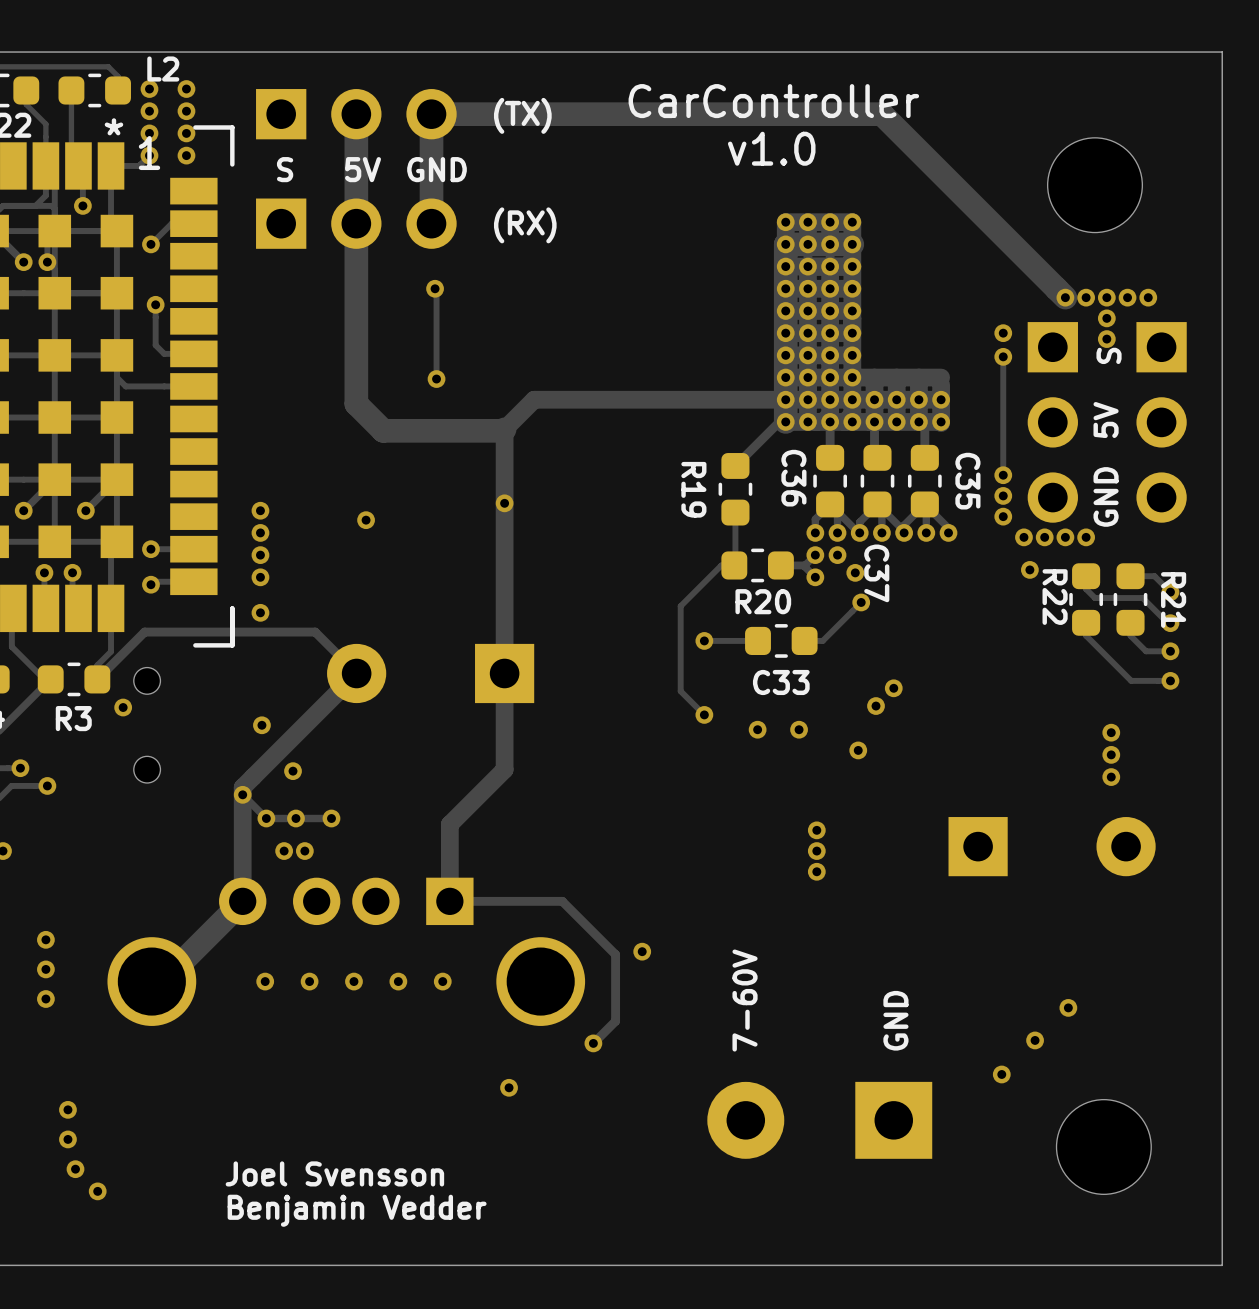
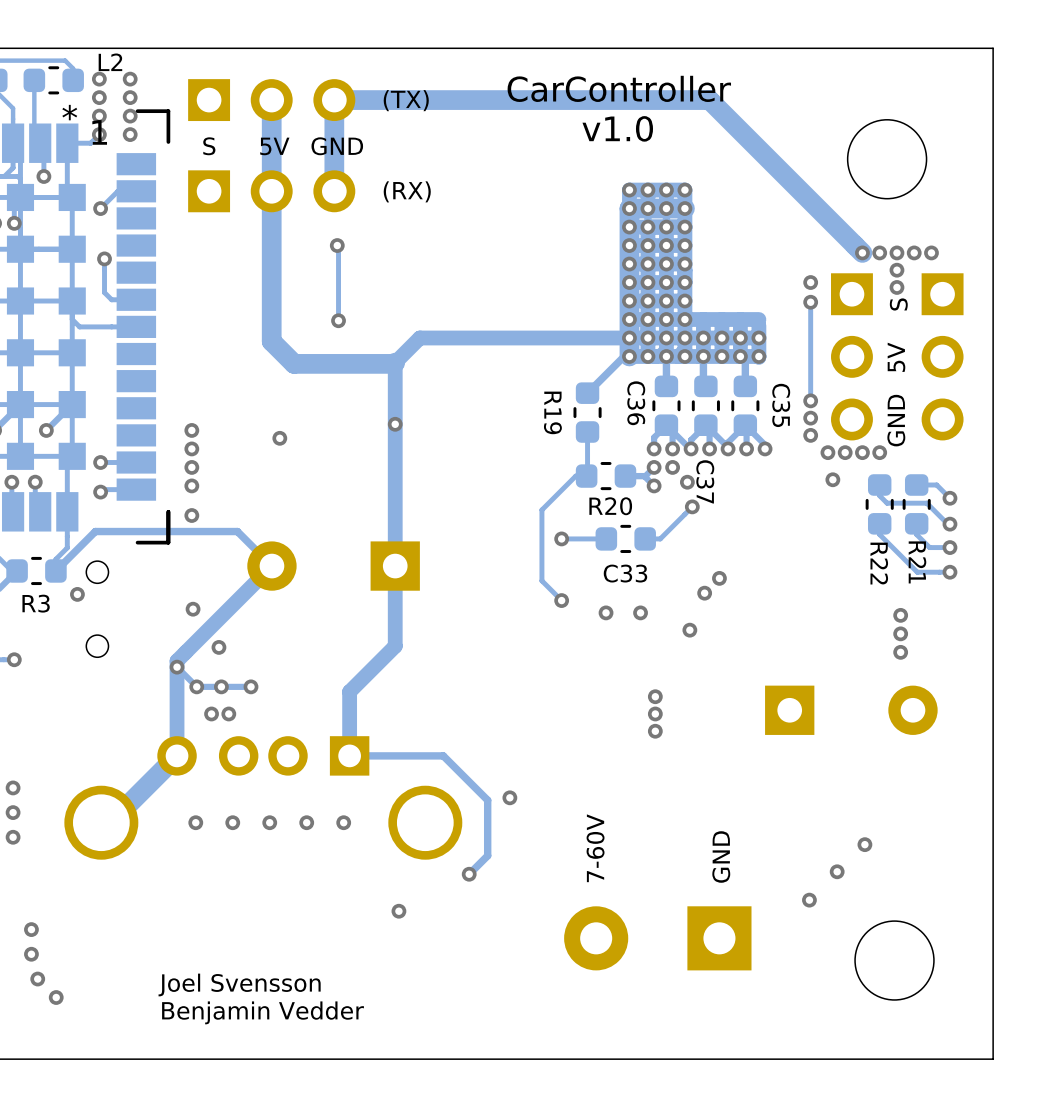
R22 name position: R22 (1055, 597) -> R22 (879, 563)
R21 name position: R21 (1173, 600) -> R21 (917, 562)

